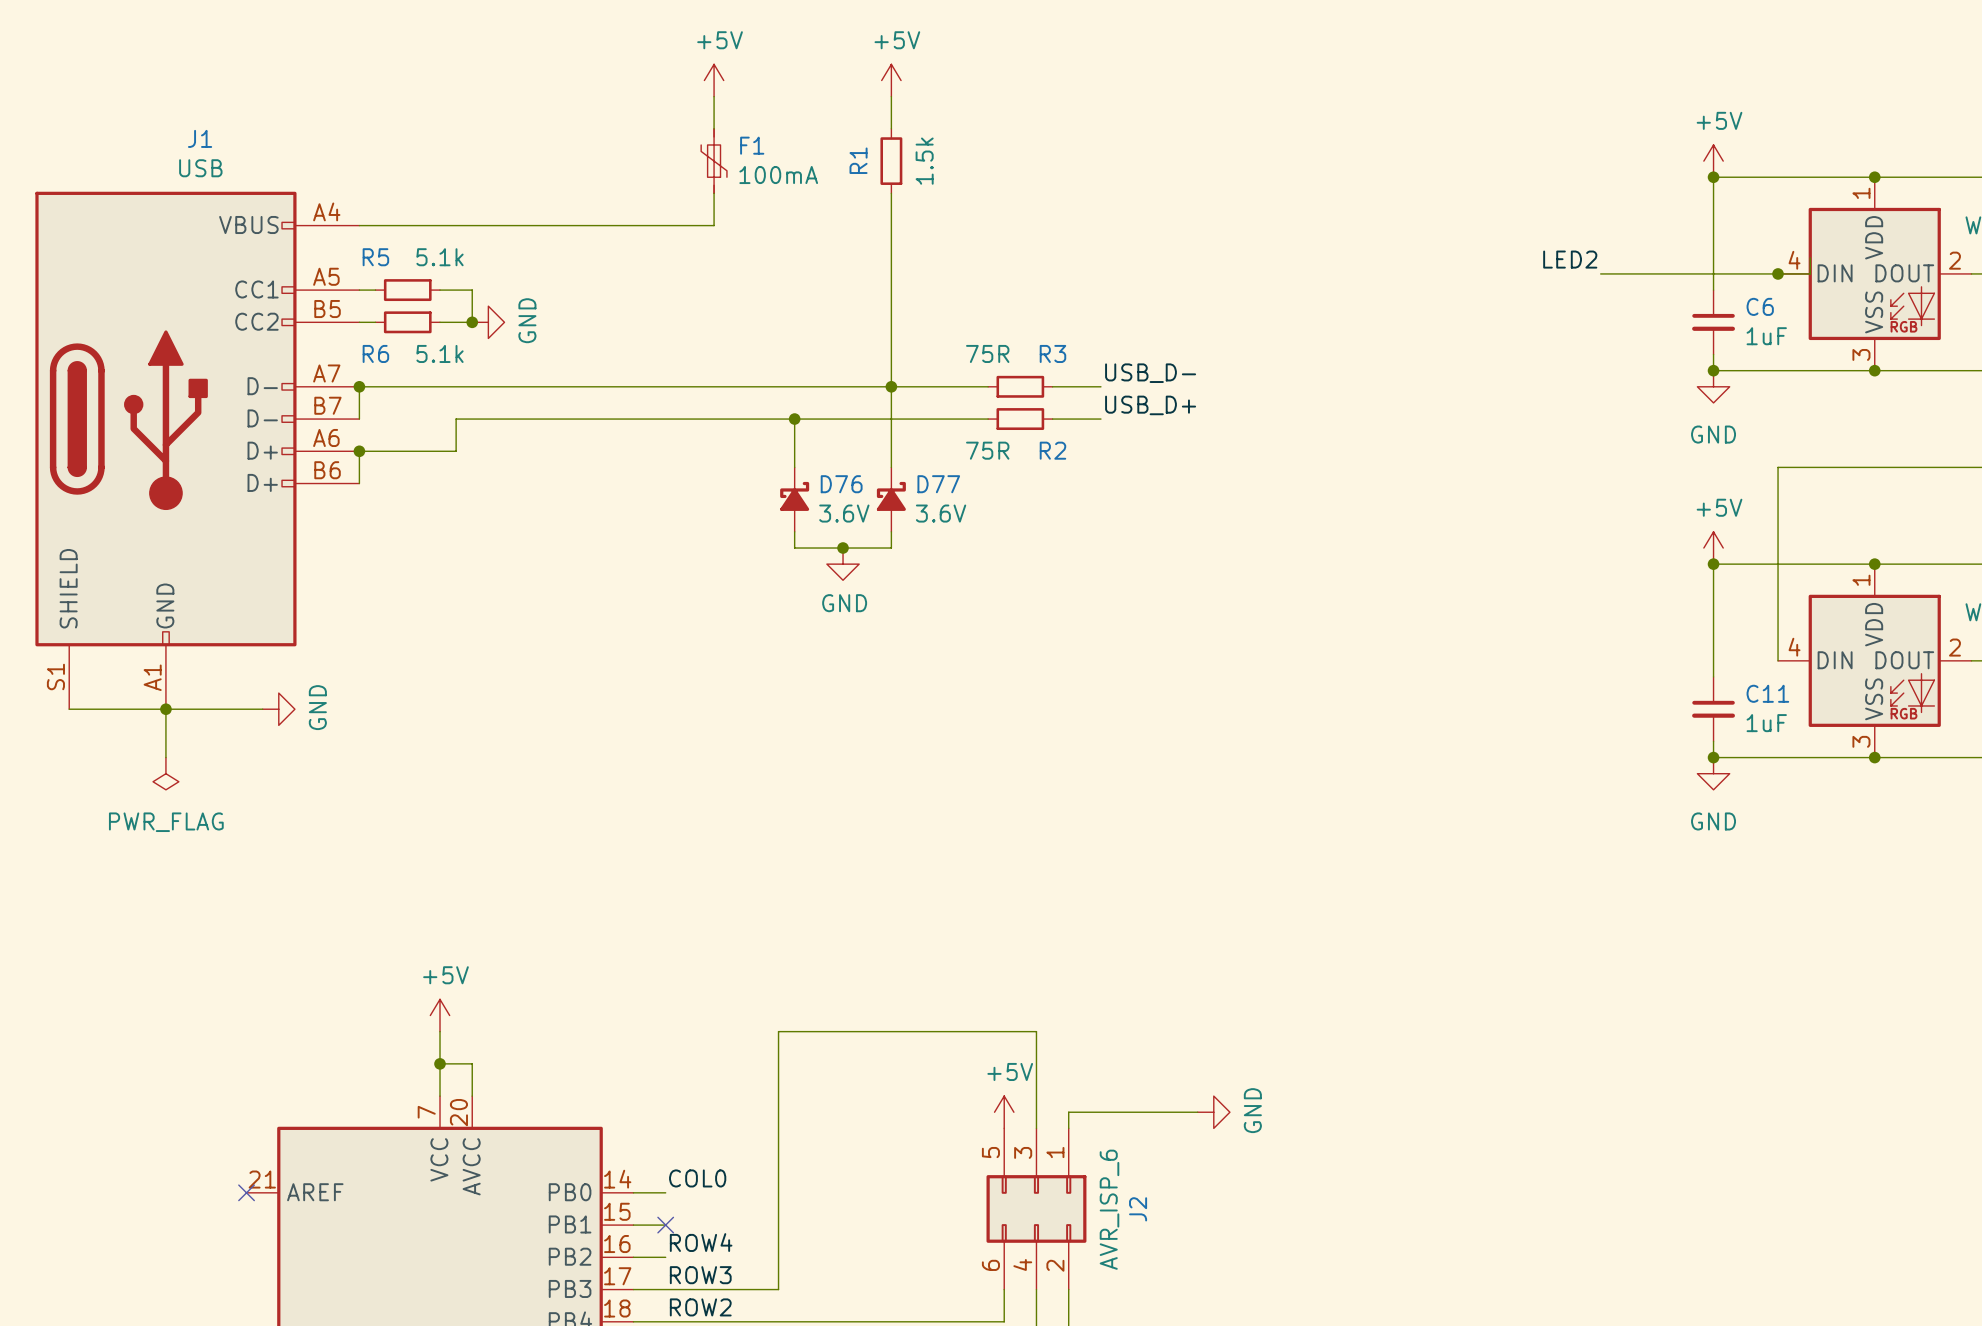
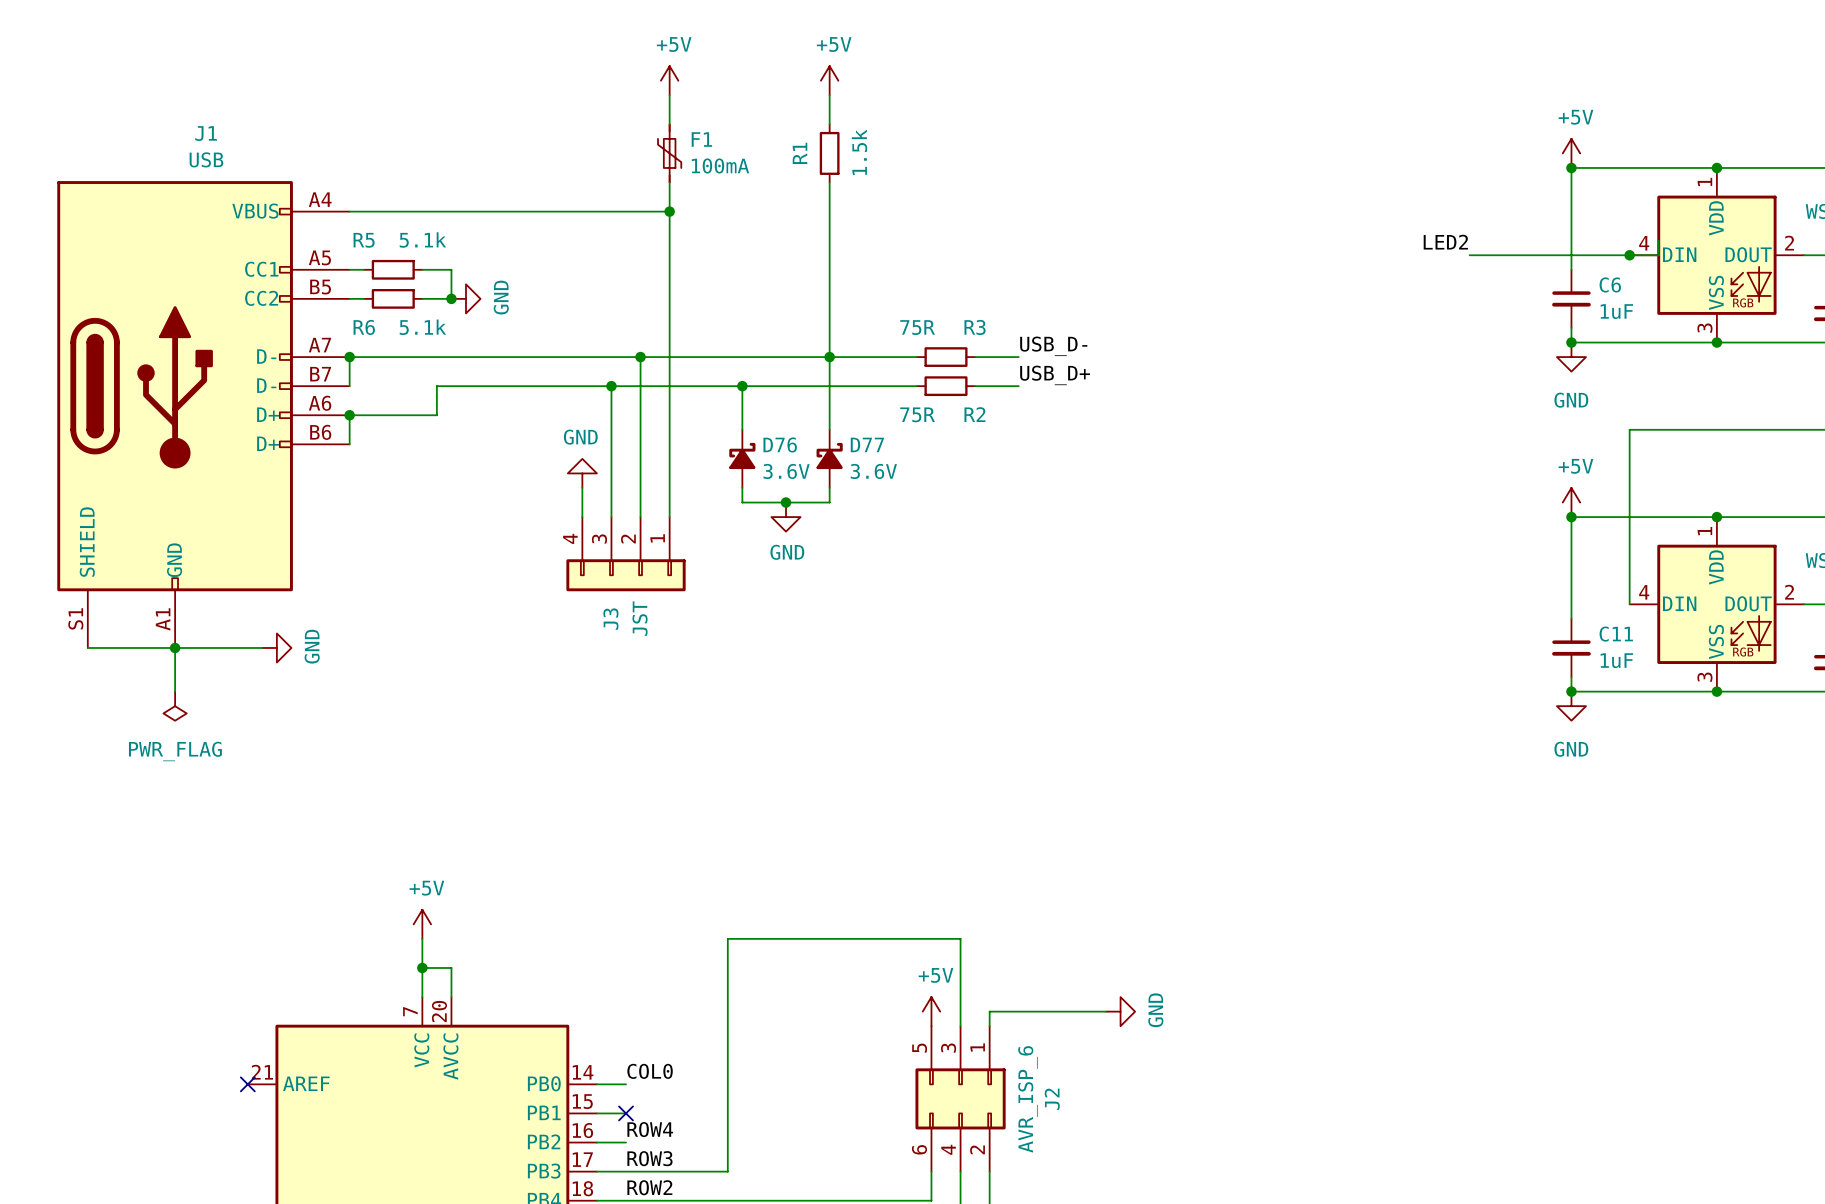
wire: none -> (669, 211) (669, 517)
junction: none -> (669, 211)
wire: none -> (640, 357) (640, 517)
junction: none -> (640, 357)
wire: none -> (611, 386) (611, 517)
junction: none -> (611, 386)
power symbol: none -> GND (582, 473)
wire: none -> (582, 487) (582, 517)
J3: none -> JST (626, 554)

